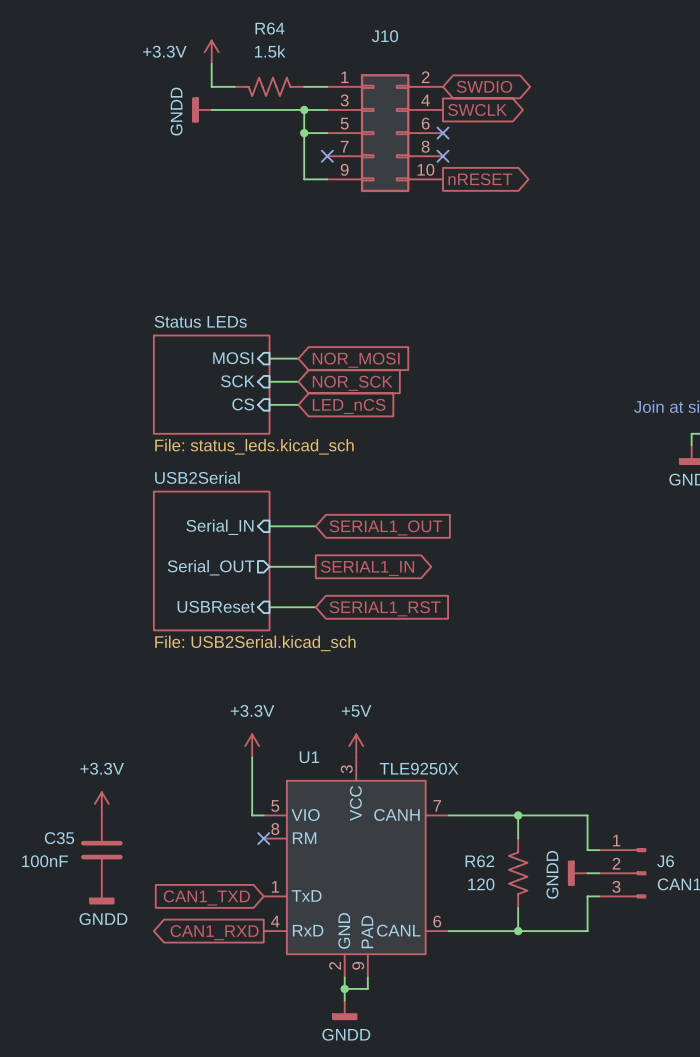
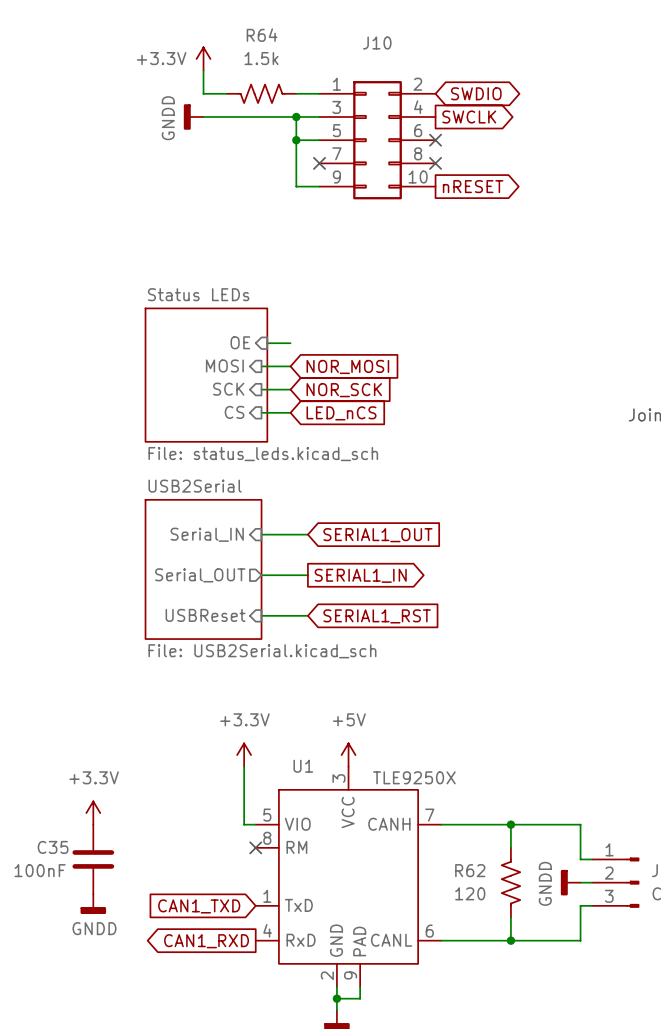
sheet pin: none -> OE (240, 342)
wire: none -> (267, 343) (290, 343)
sheet Status LEDs: none -> File: status_leds.kicad_sch (206, 375)
sheet Status LEDs: File: status_leds.kicad_sch (211, 384) -> none

